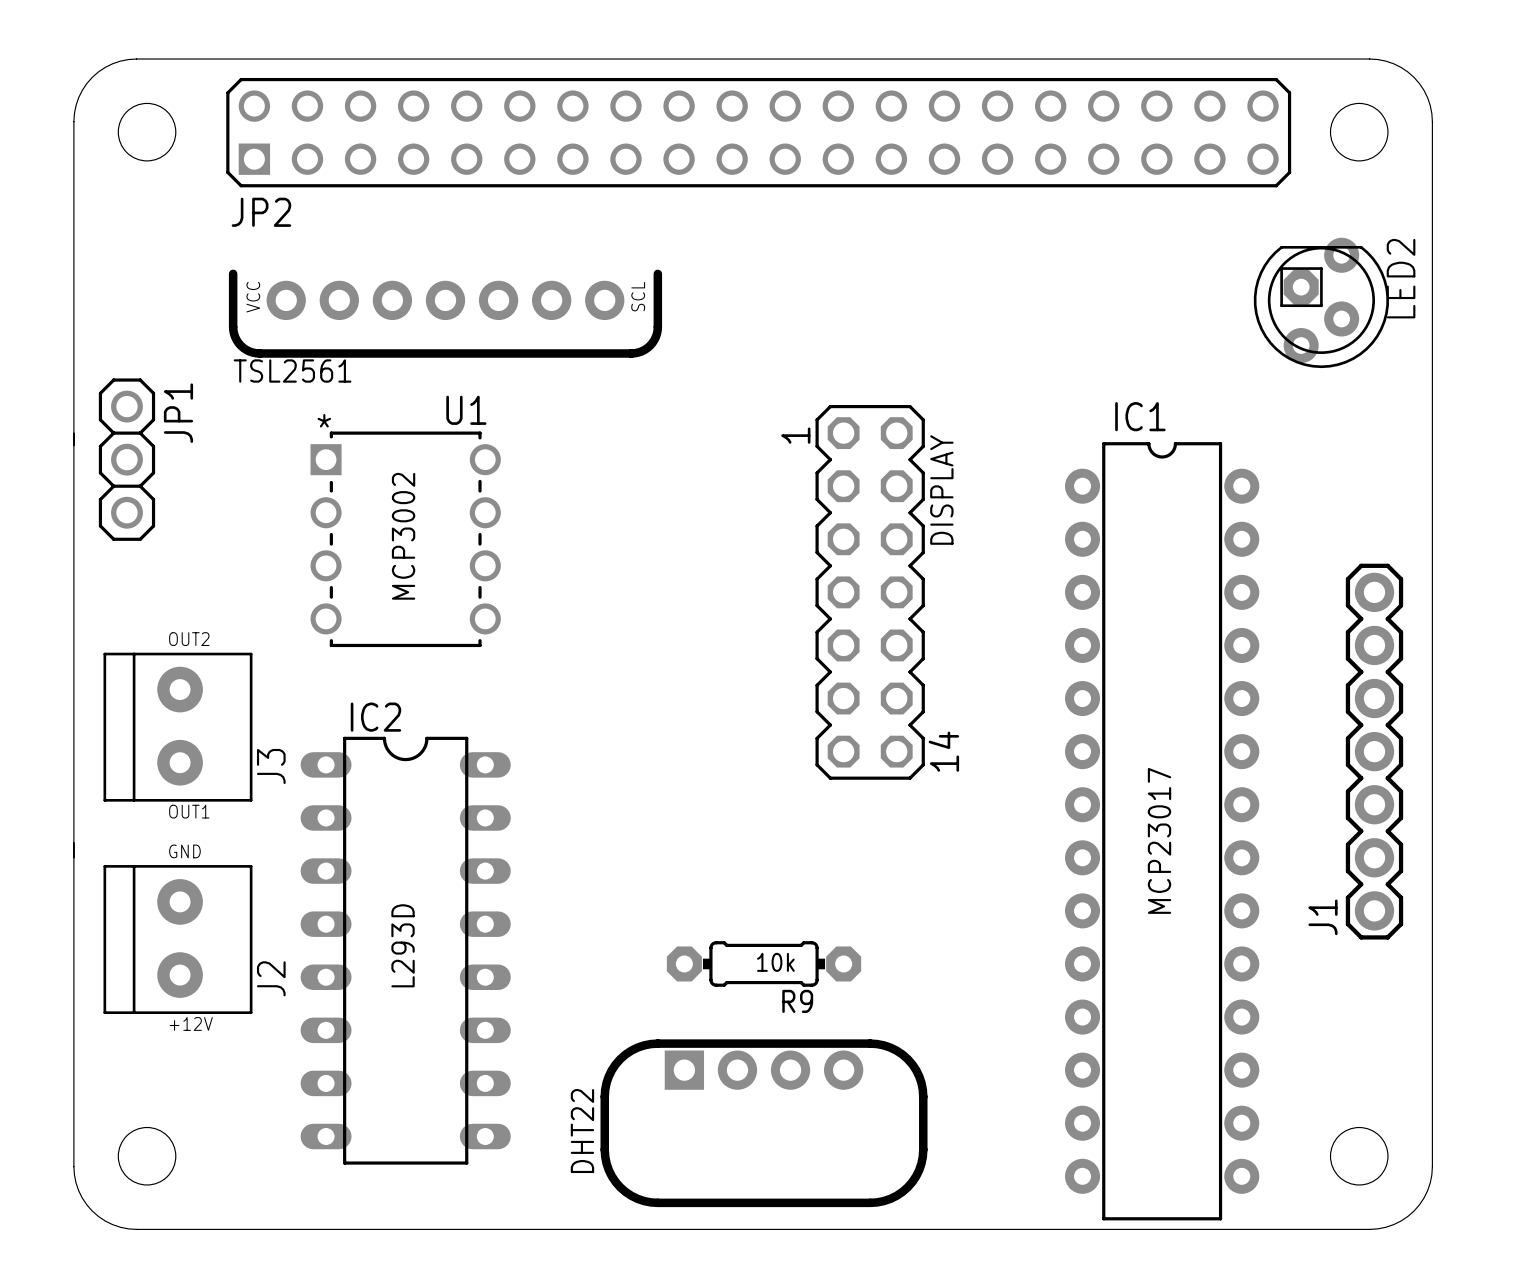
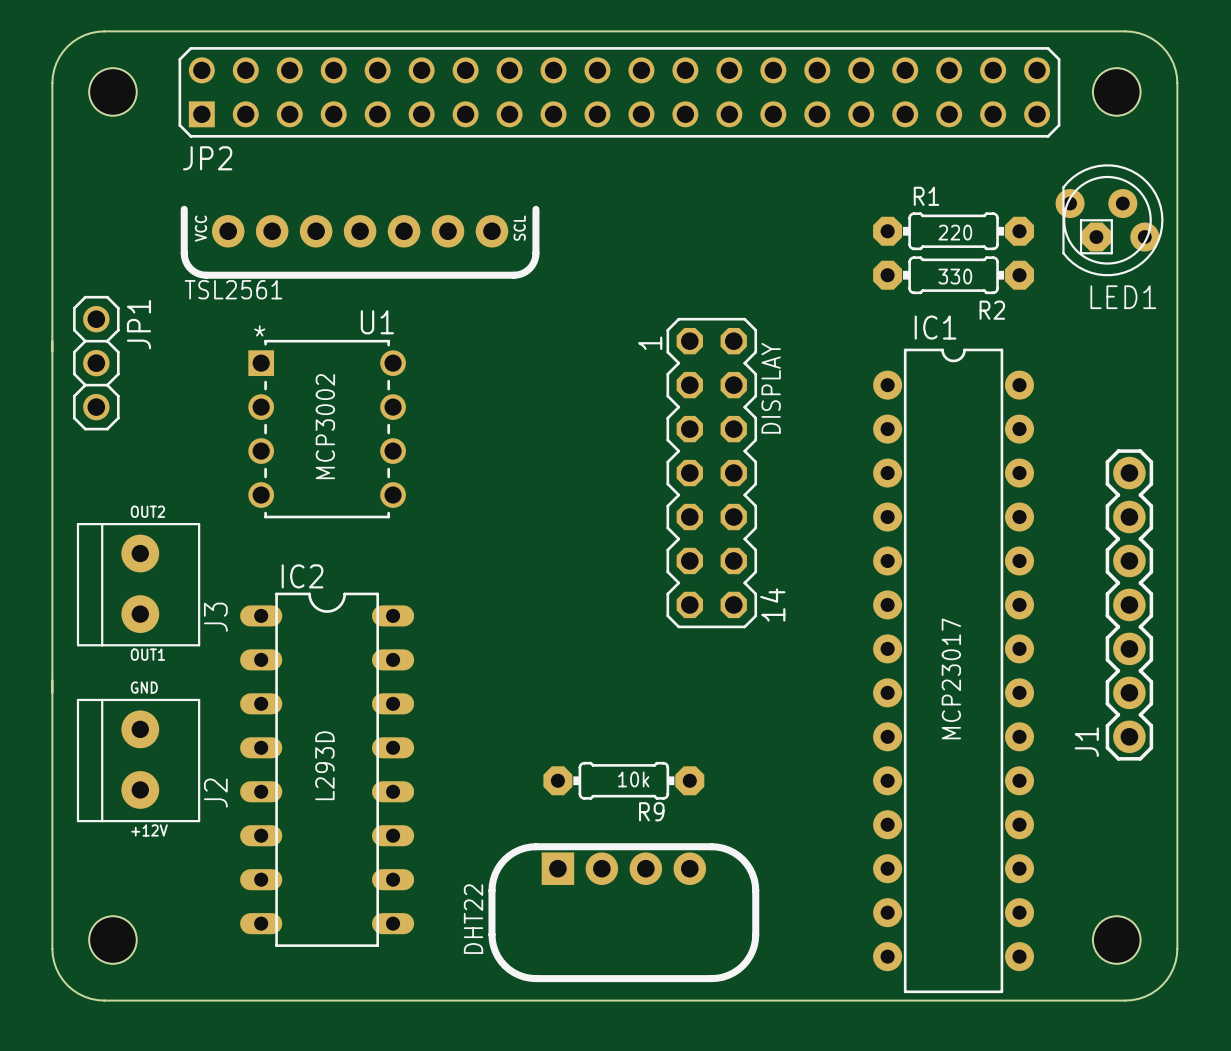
LED1: none -> (1109, 220)
R1: none -> 220 (953, 231)
LED2: (1321, 302) -> none
R2: none -> 330 (953, 275)

